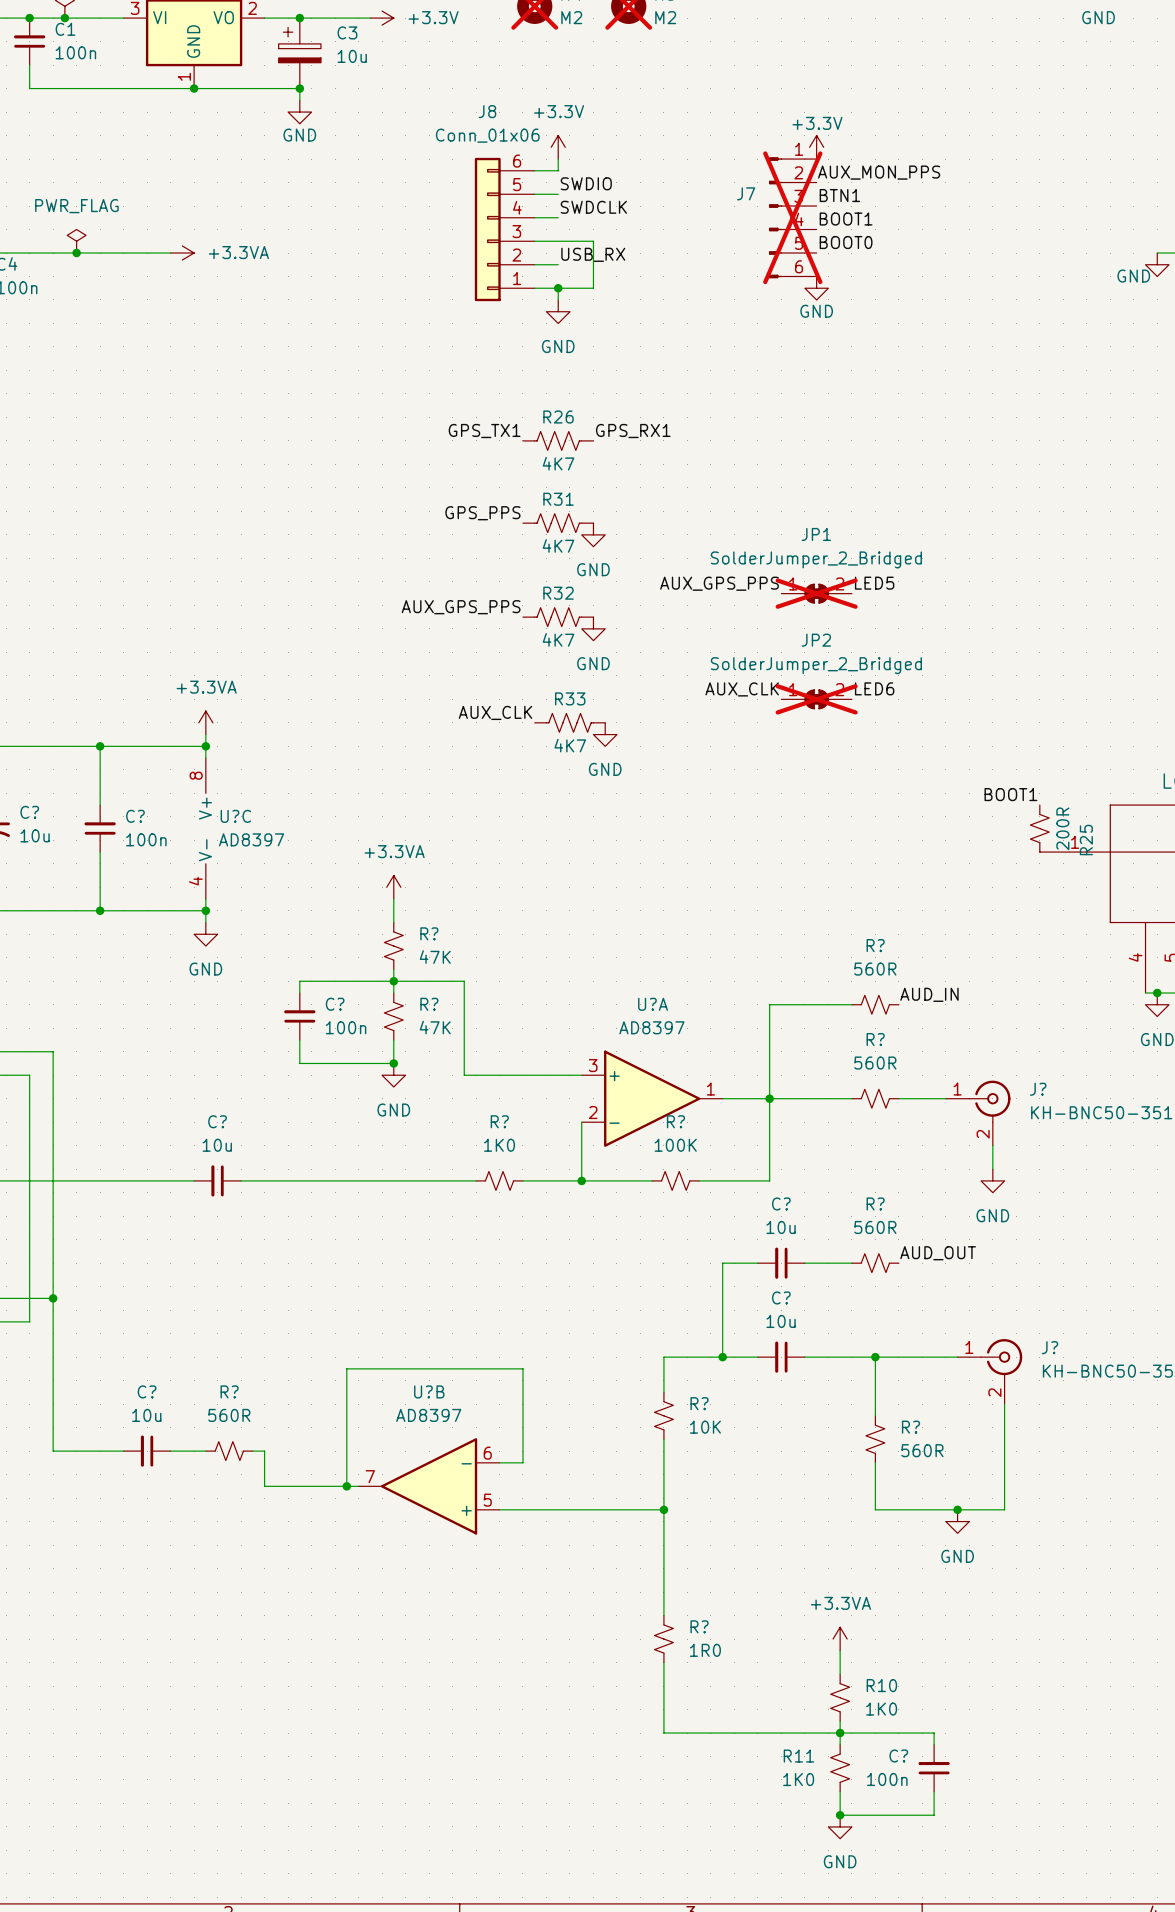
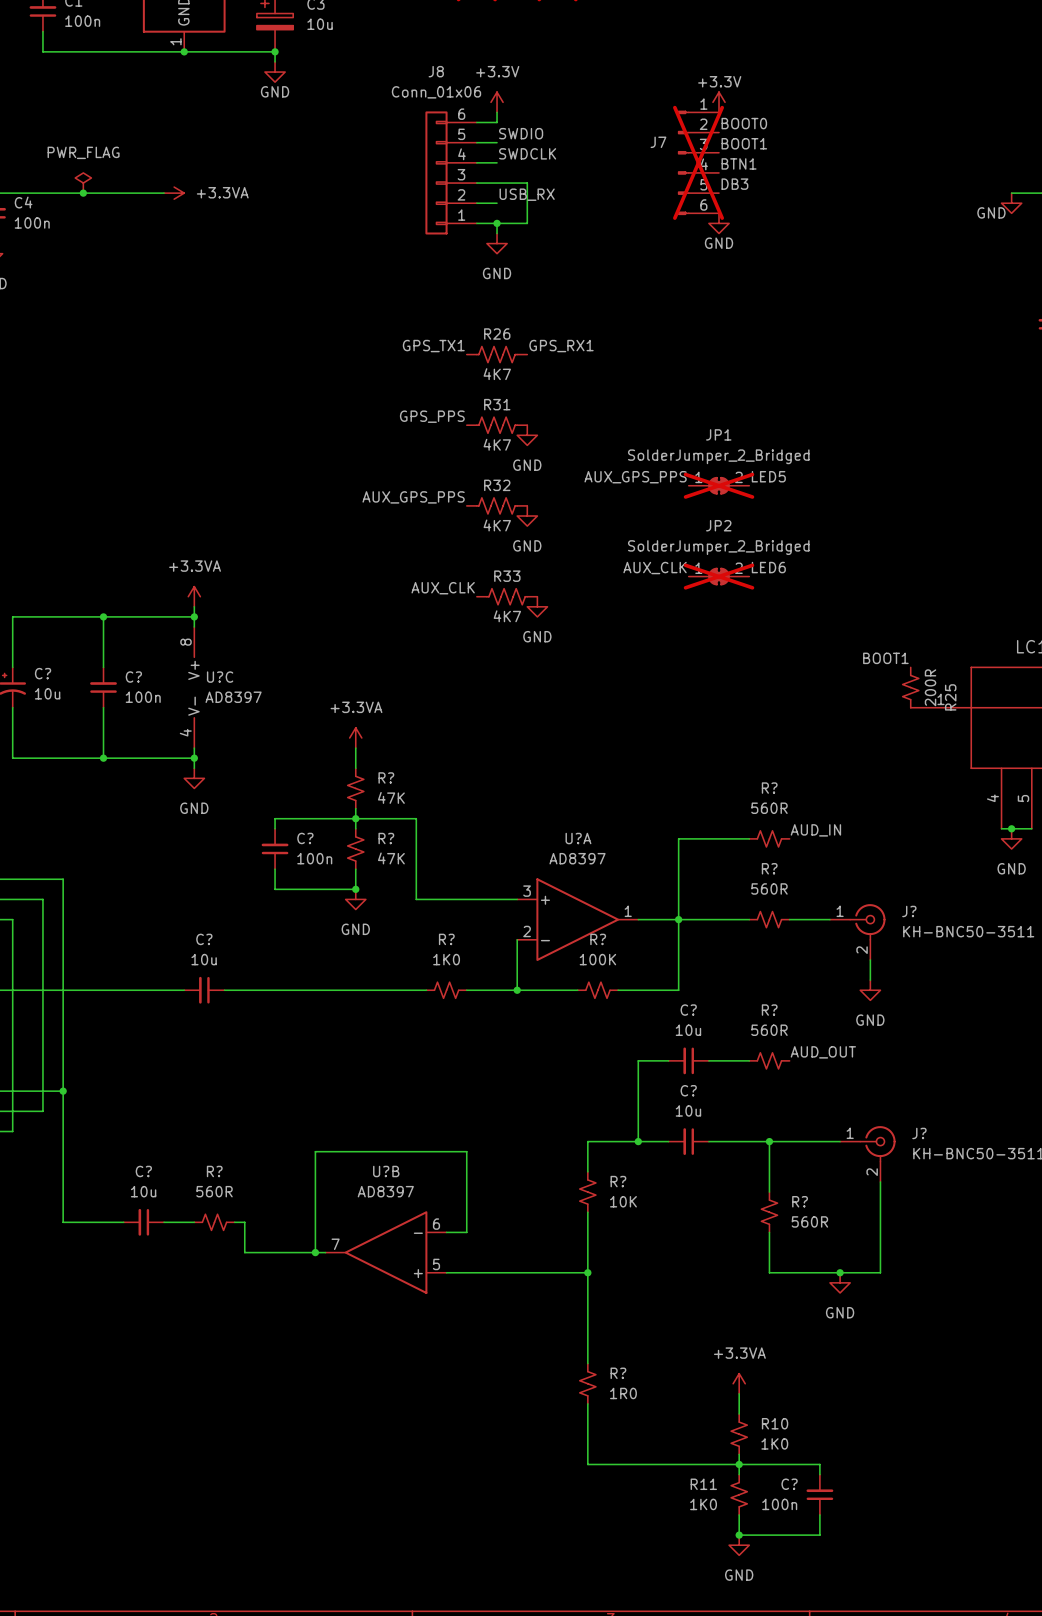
label: AUX_MON_PPS (879, 172) -> BOOT0 (744, 123)
label: BTN1 (839, 195) -> BOOT1 (744, 143)
label: BOOT1 (846, 219) -> BTN1 (739, 163)
label: BOOT0 (846, 242) -> DB3 (734, 184)

